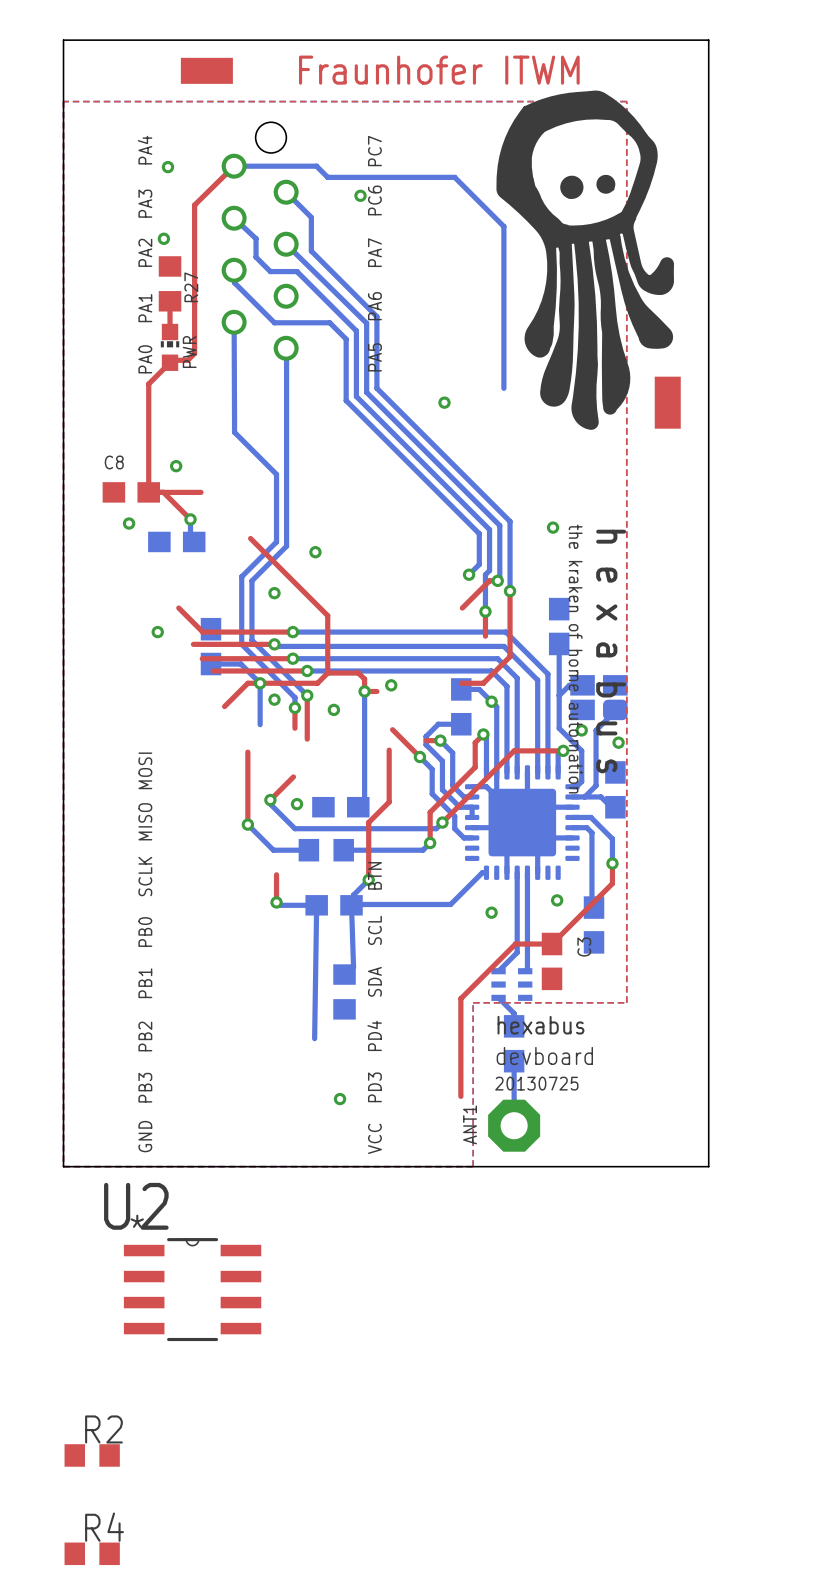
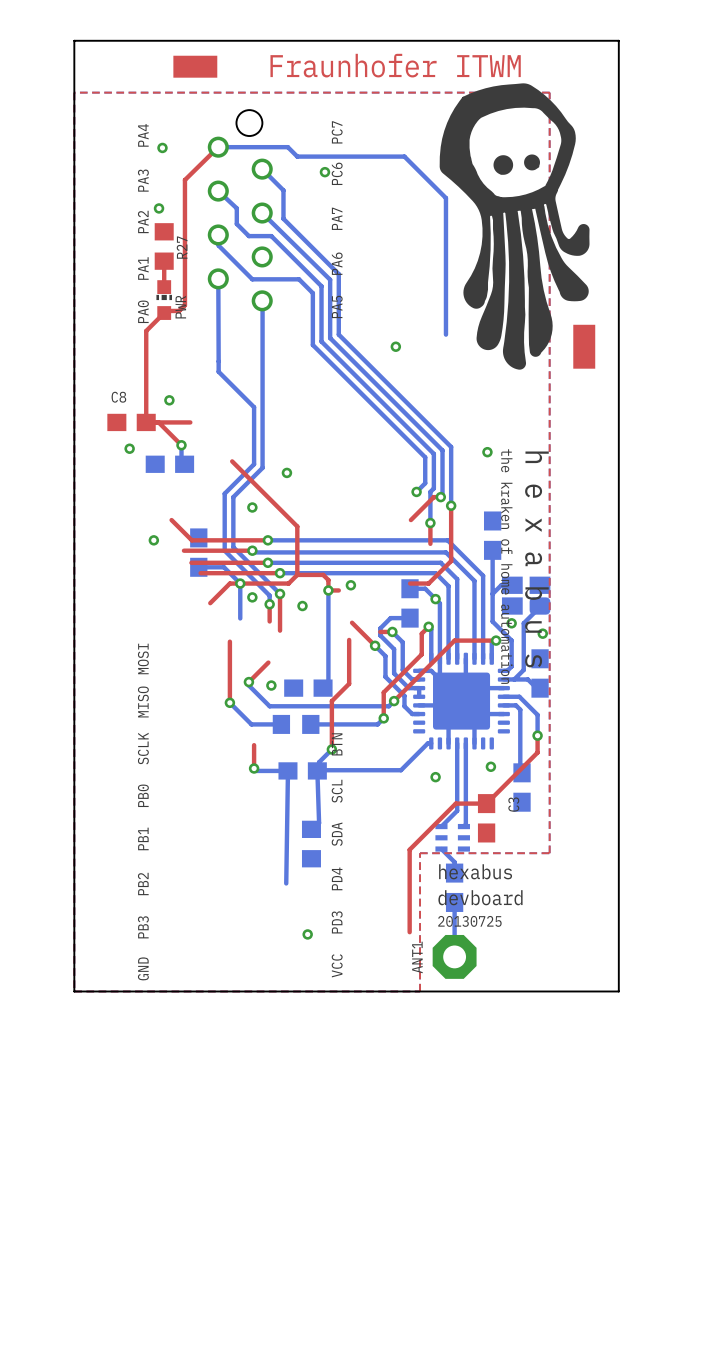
U2: (192, 1289) -> none
R2: (92, 1455) -> none
R4: (92, 1553) -> none

